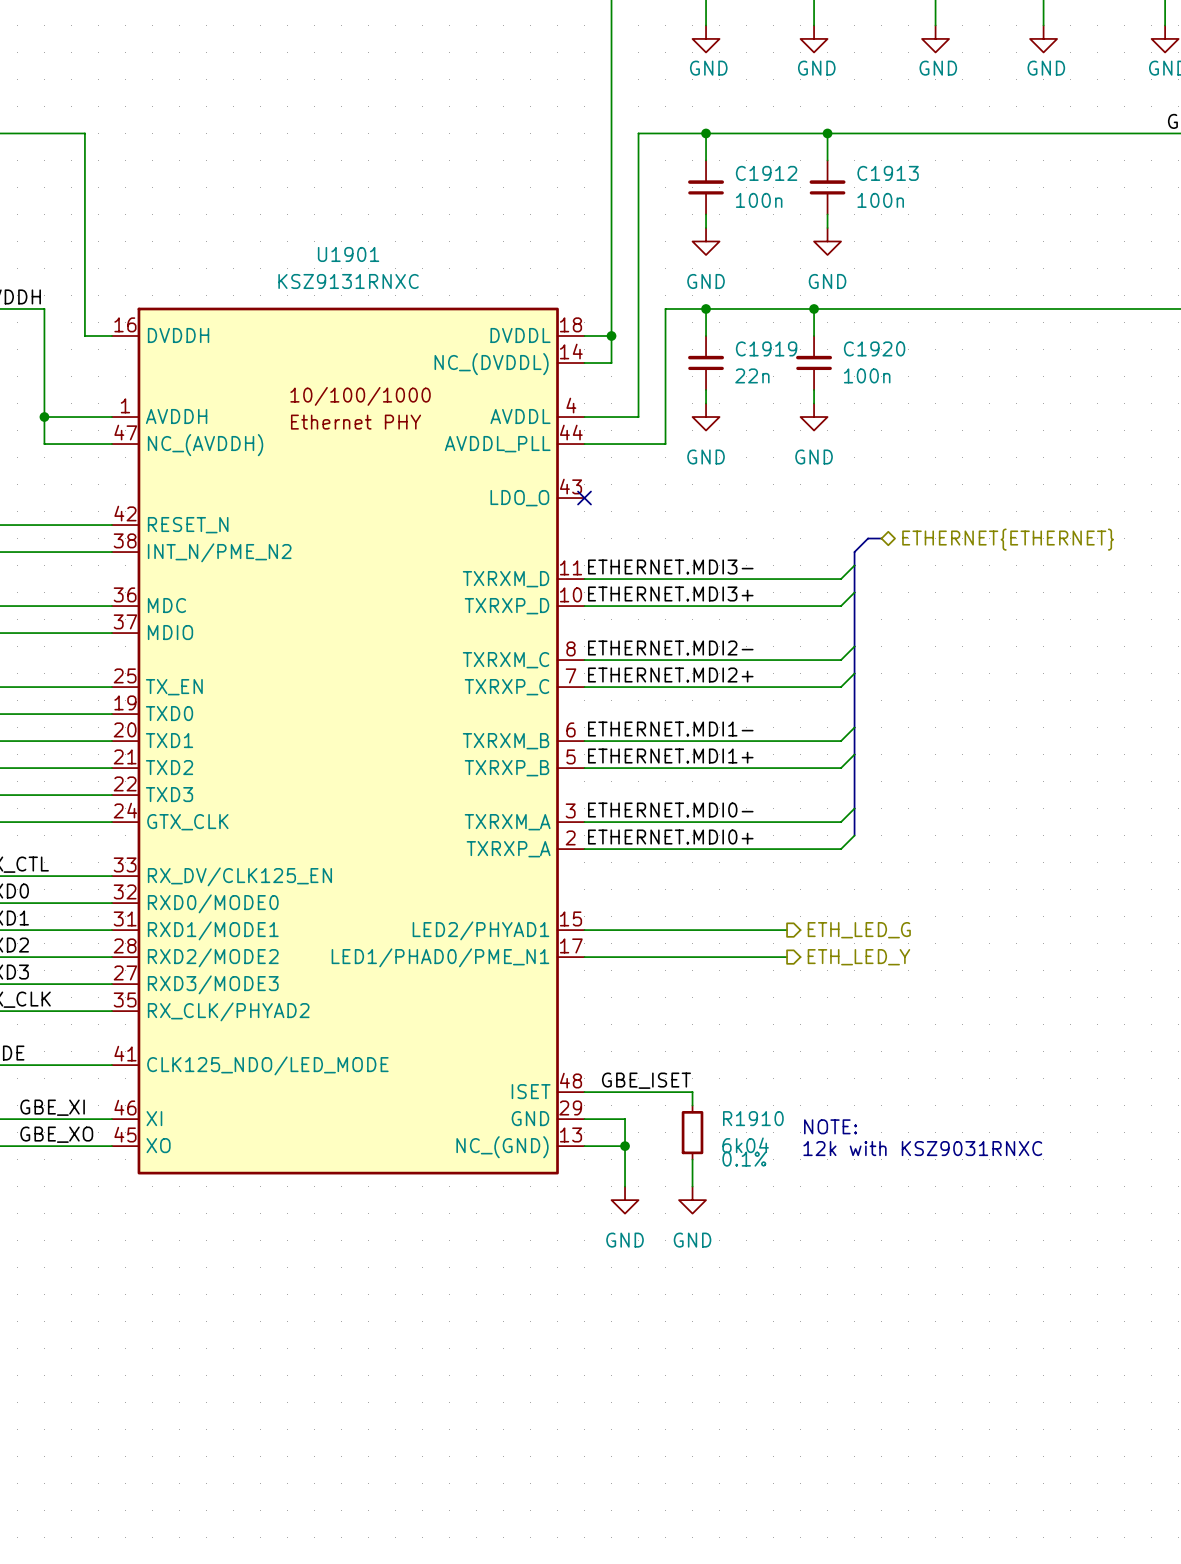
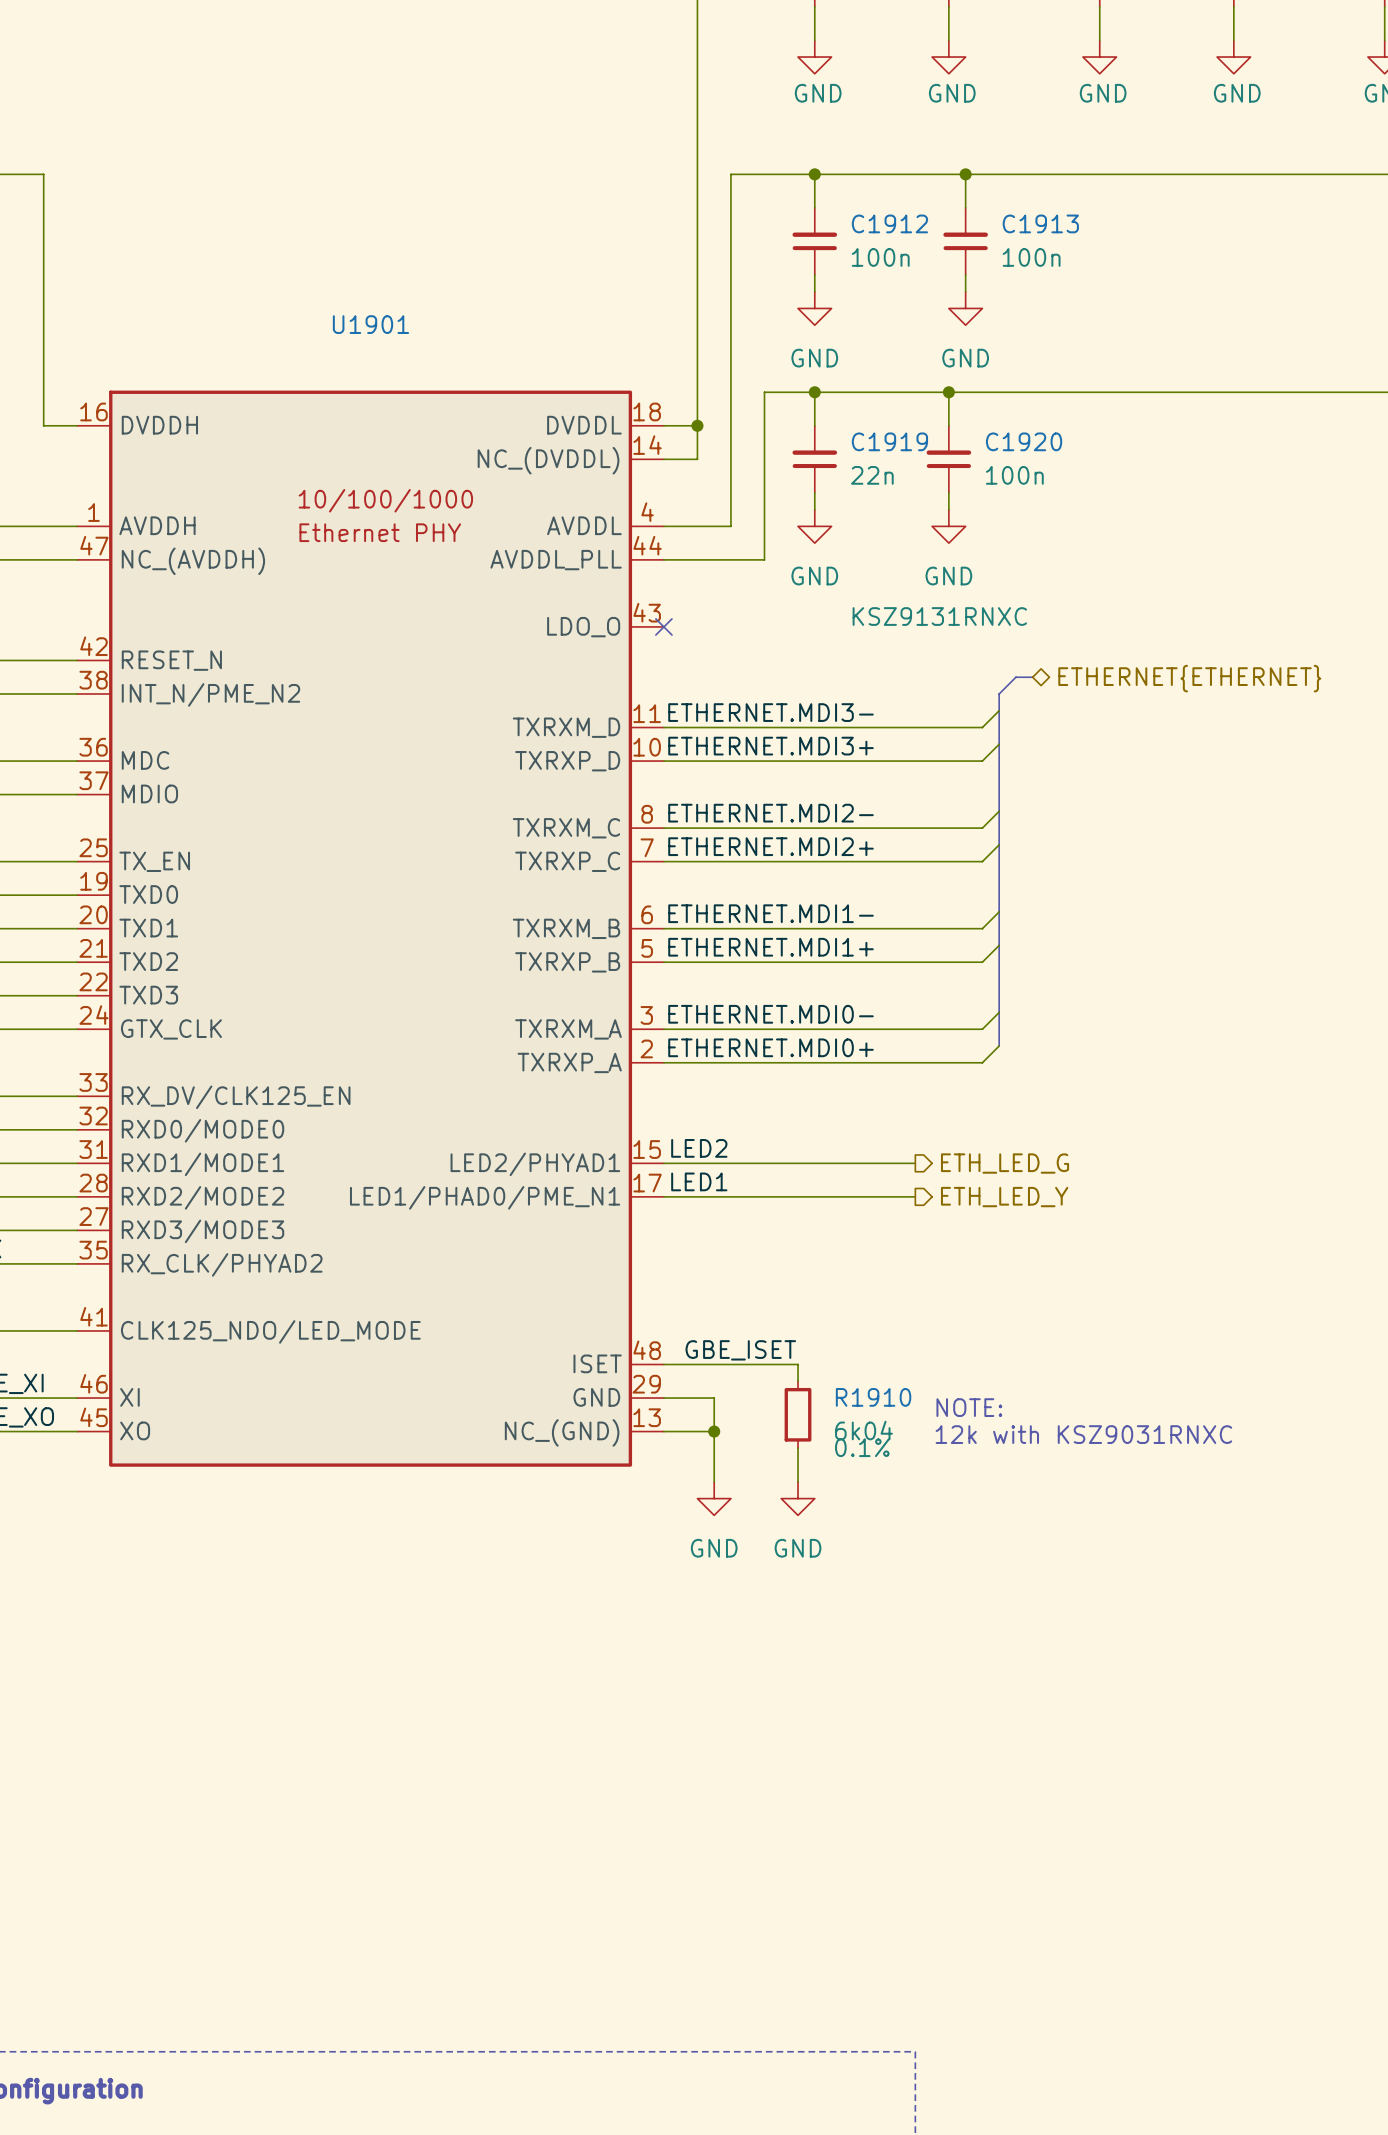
U1901 text position: KSZ9131RNXC (348, 281) -> KSZ9131RNXC (939, 616)
label: none -> LED2 (699, 1148)
label: none -> LED1 (699, 1181)

